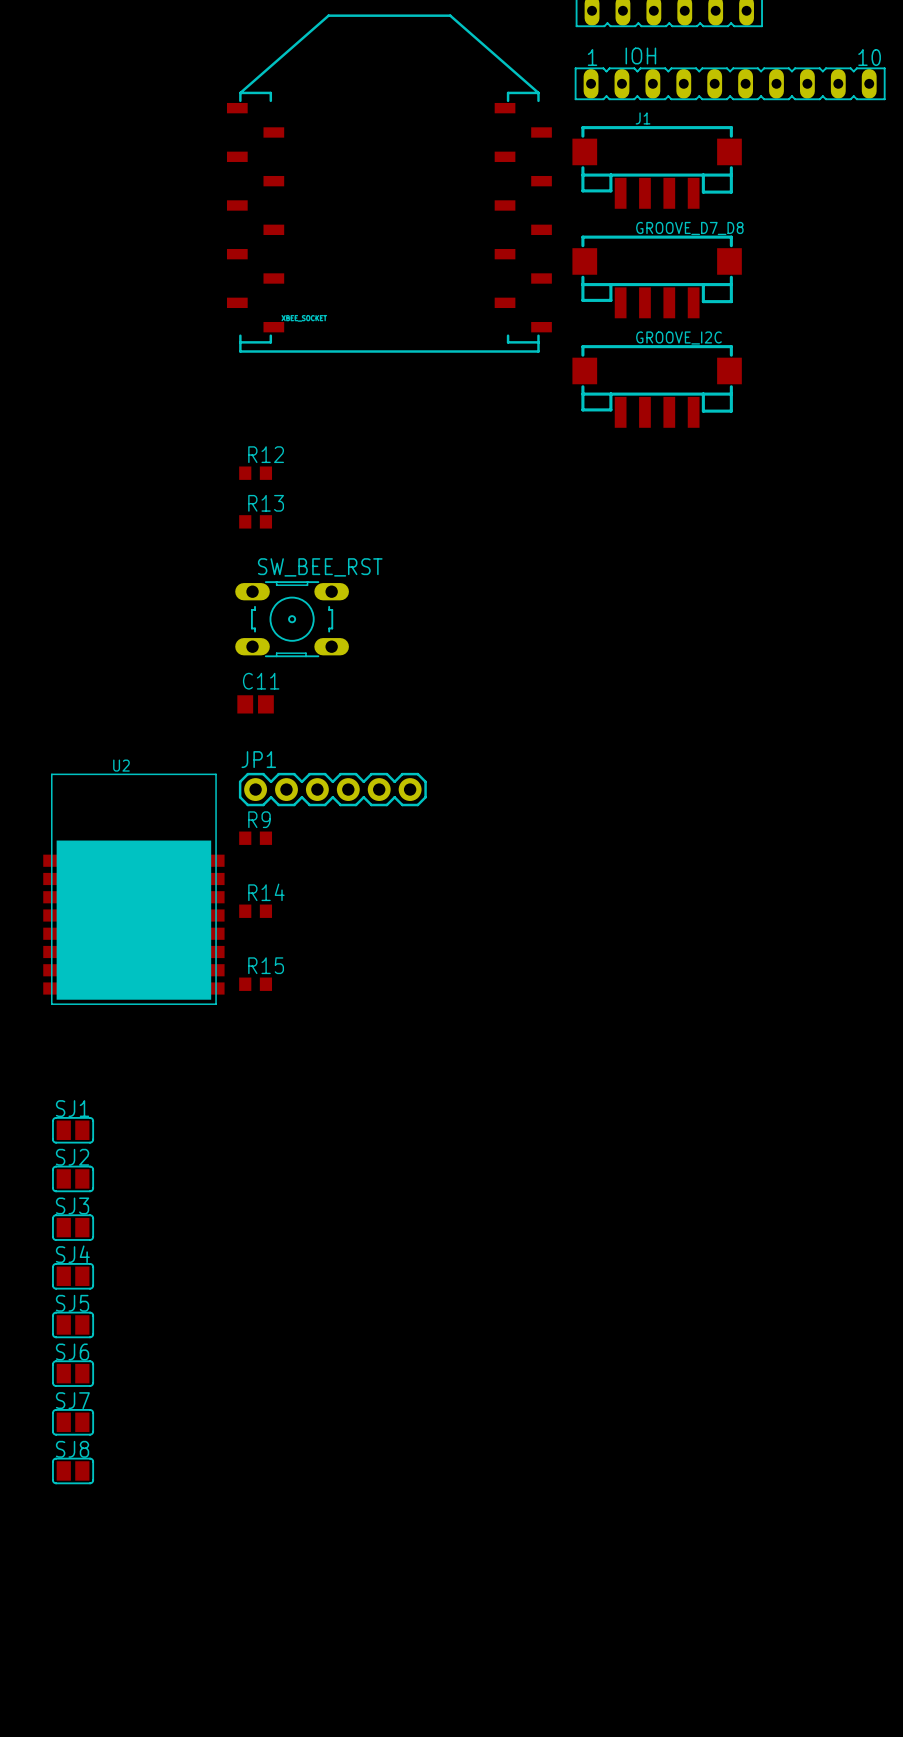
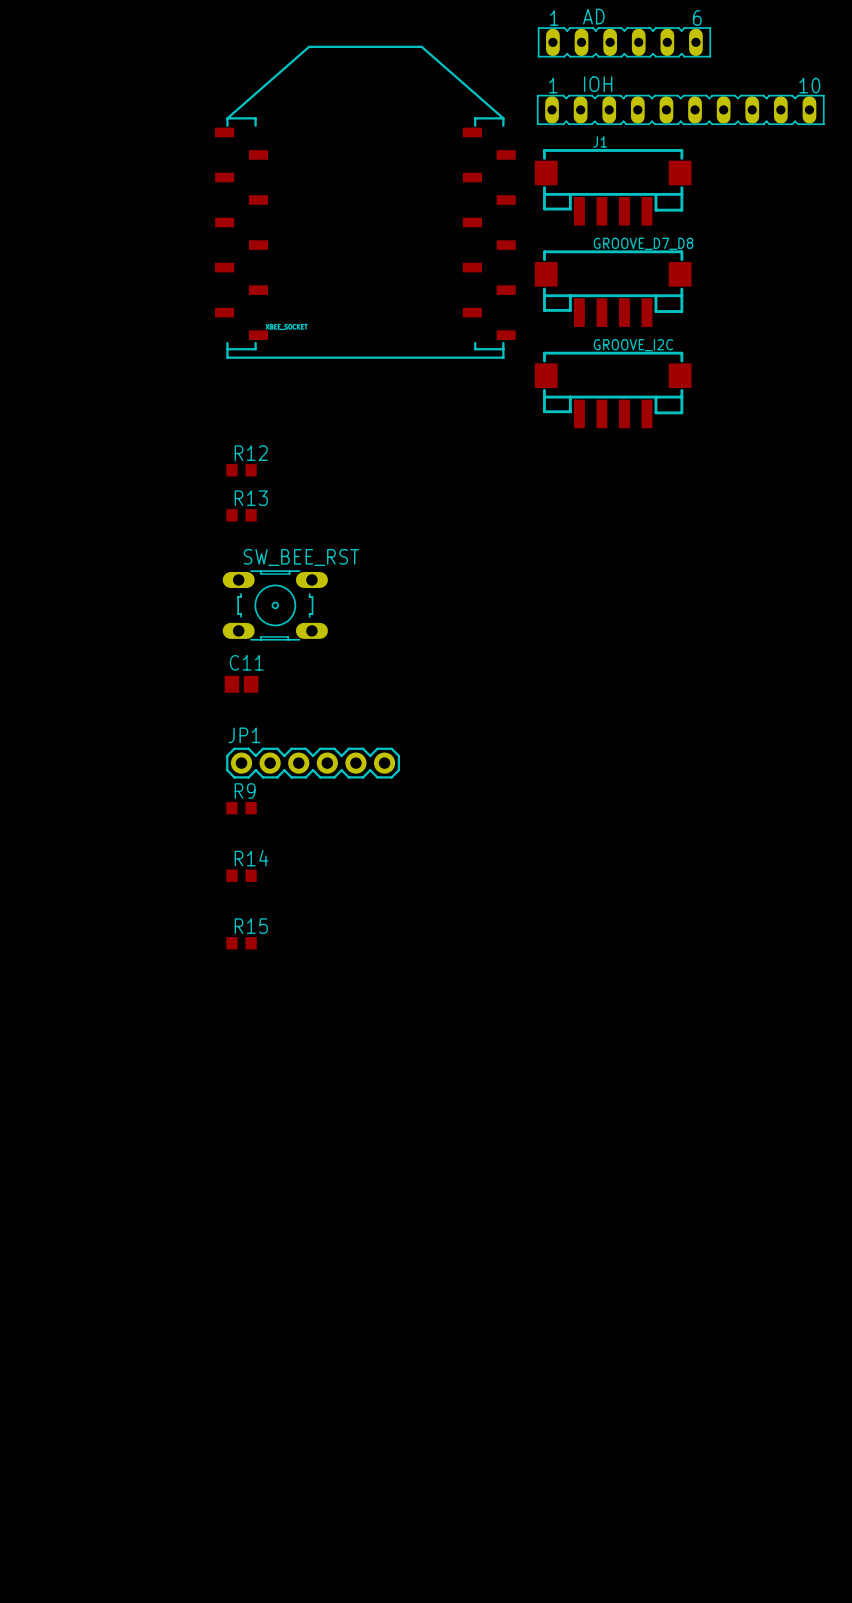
U2: (133, 889) -> none
SJ1: (73, 1130) -> none
SJ2: (73, 1178) -> none
SJ3: (73, 1227) -> none
SJ4: (73, 1276) -> none
SJ5: (73, 1324) -> none
SJ6: (73, 1373) -> none
SJ7: (73, 1422) -> none
SJ8: (73, 1470) -> none

